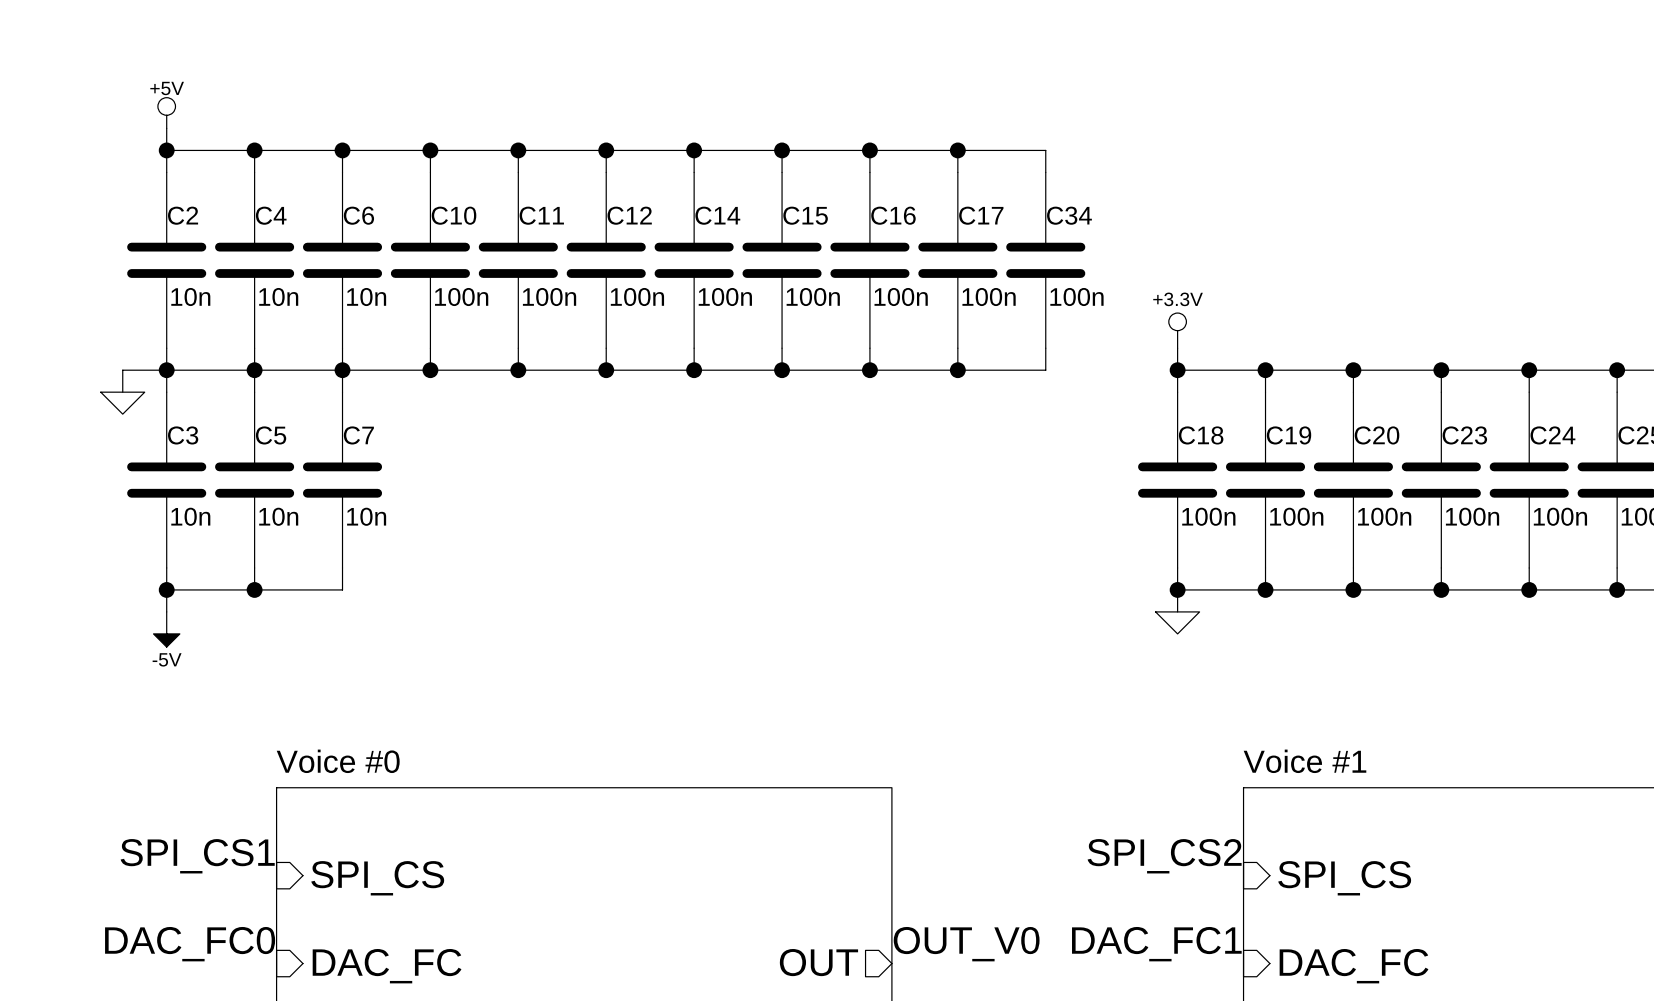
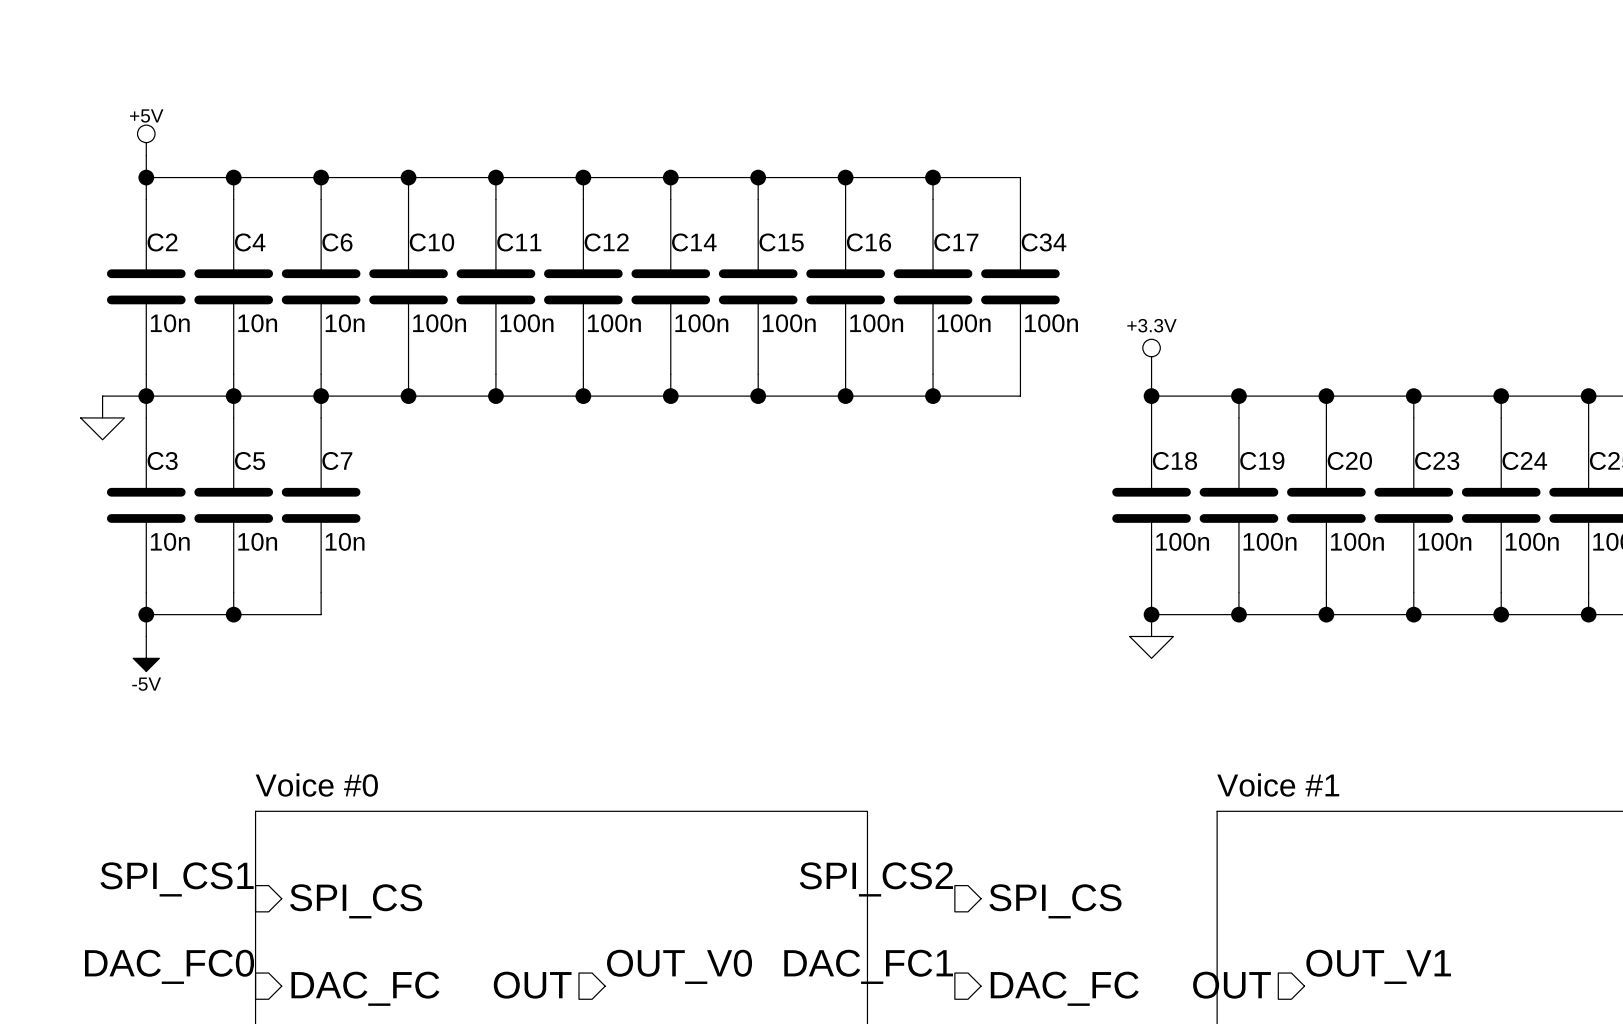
label position: SPI_CS2 (1164, 856) -> SPI_CS2 (876, 879)
sheet pin: none -> SPI_CS (1055, 901)
sheet pin: SPI_CS (1344, 878) -> none
label position: OUT_V0 (966, 944) -> OUT_V0 (679, 966)
label position: DAC_FC1 (1156, 944) -> DAC_FC1 (868, 966)
label: none -> OUT_V1 (1378, 966)
sheet pin: none -> OUT (532, 985)
sheet pin: OUT (818, 962) -> none
sheet pin: none -> OUT (1231, 985)
sheet pin: none -> DAC_FC (1064, 988)
sheet pin: DAC_FC (1354, 966) -> none

